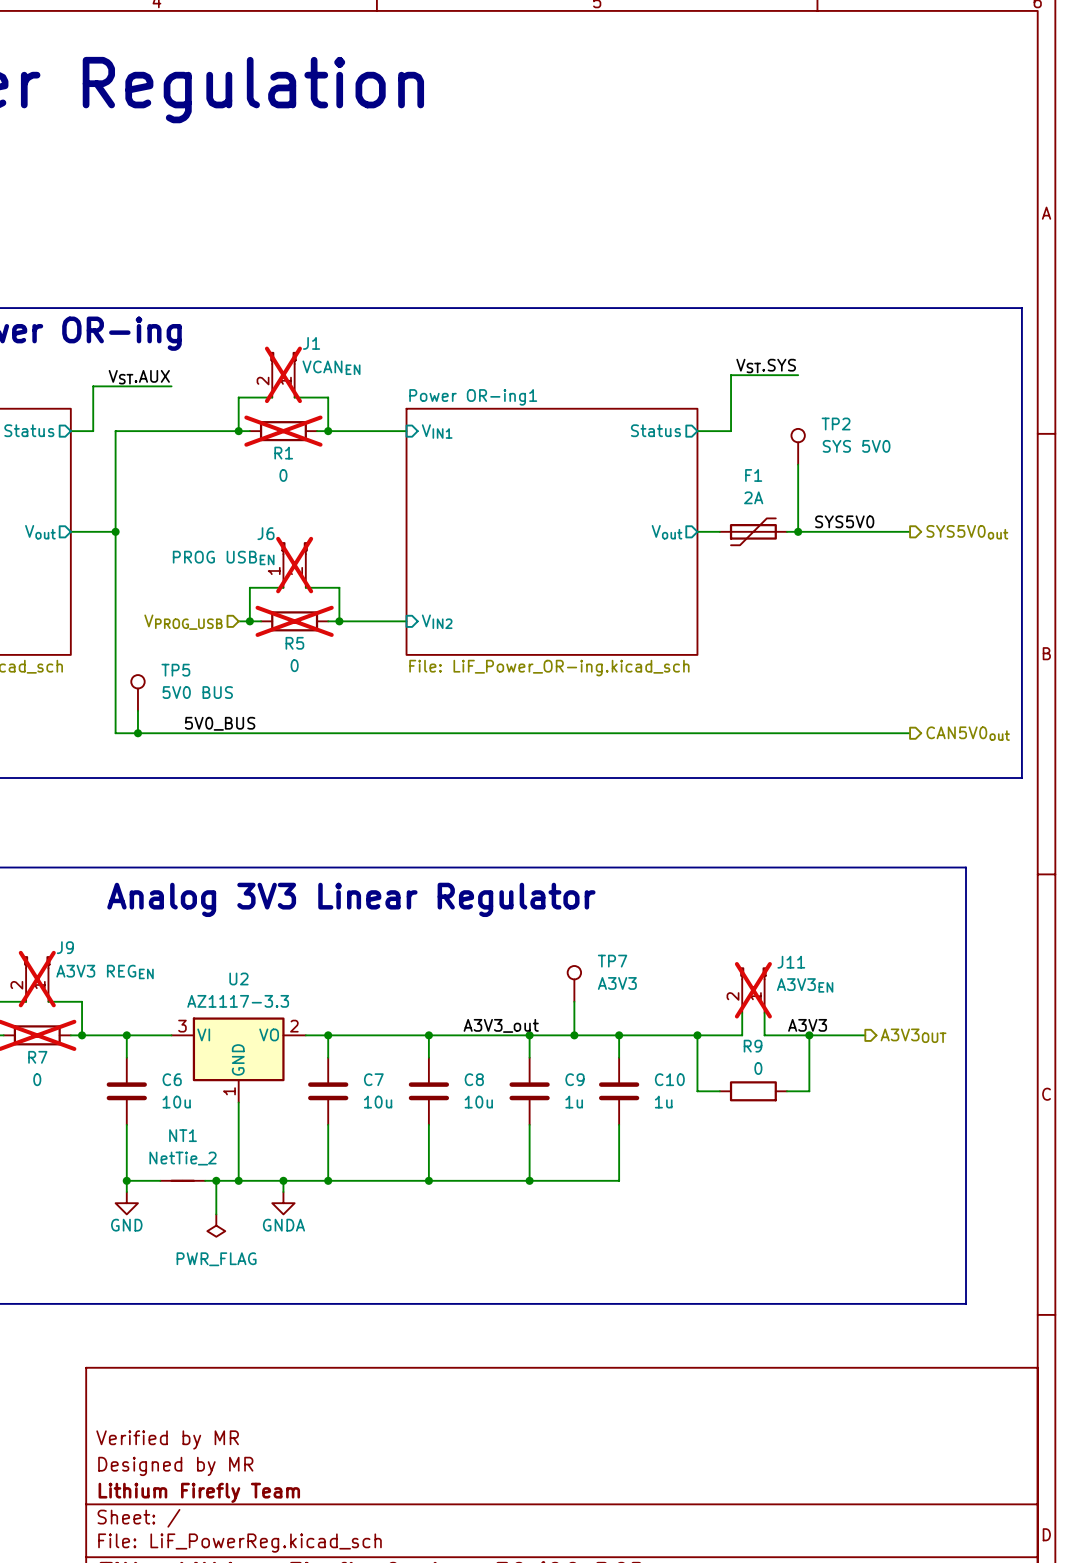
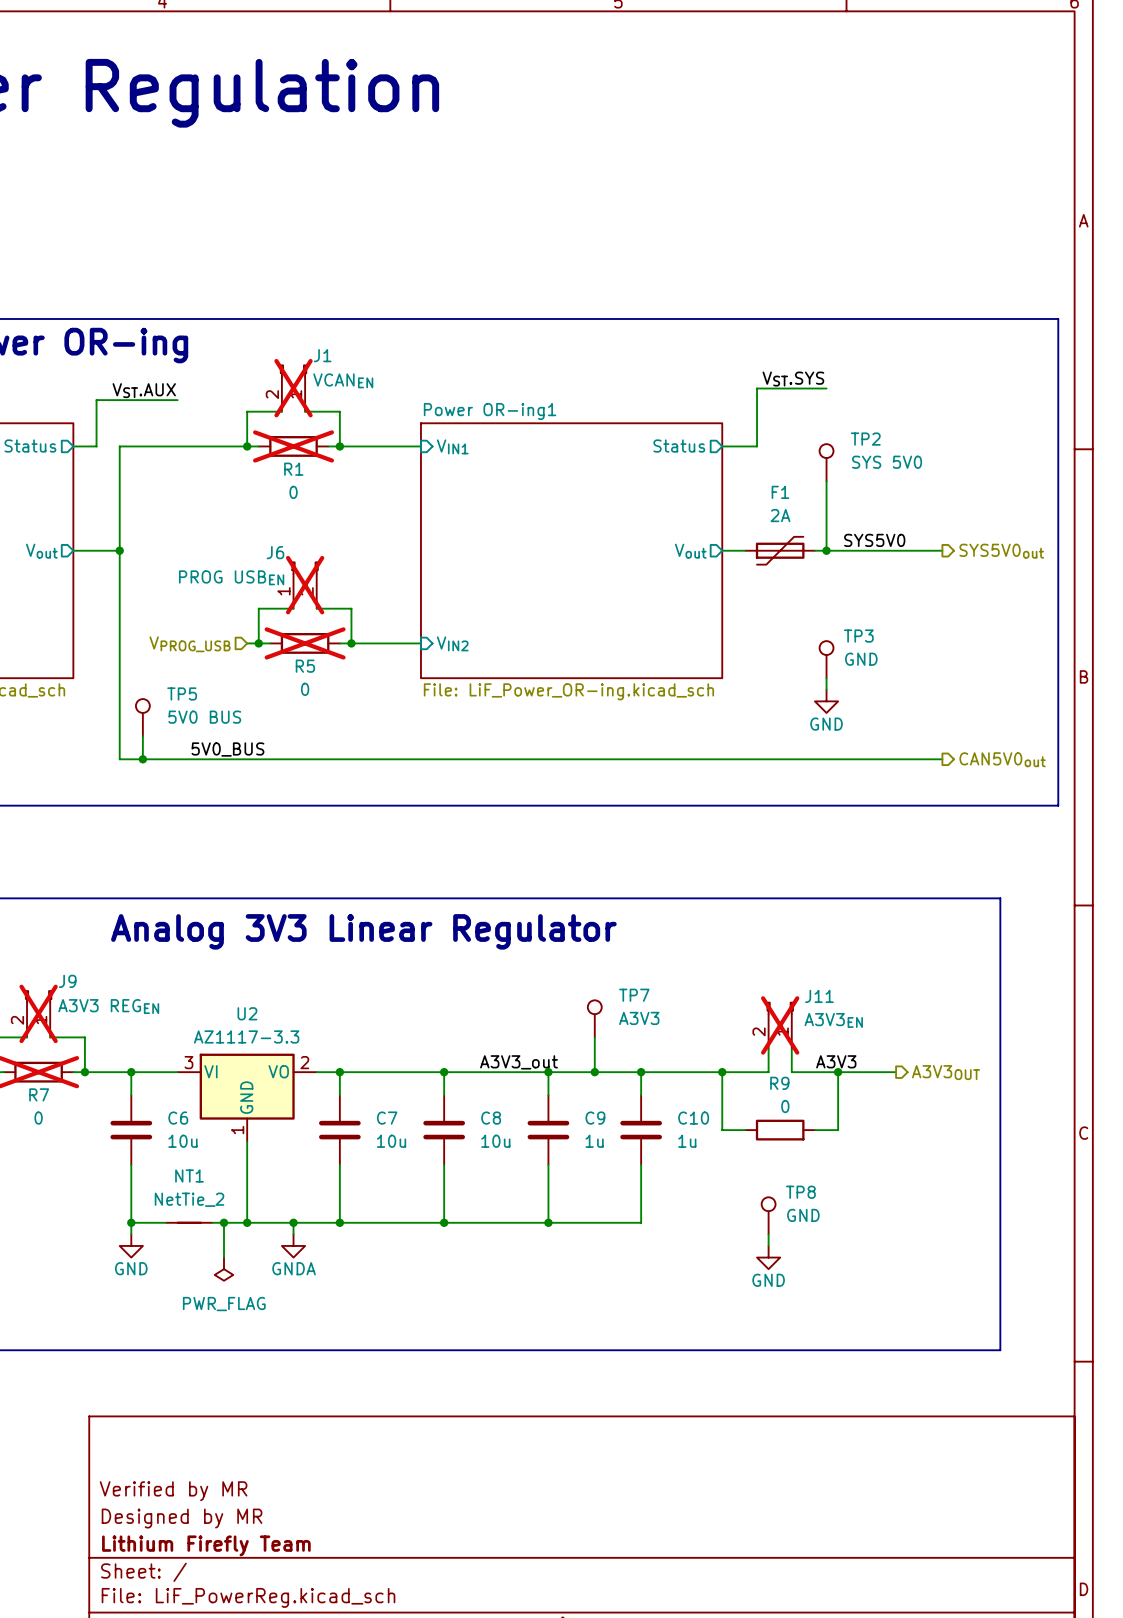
TP3: none -> GND (826, 659)
wire: none -> (826, 678) (826, 689)
power symbol: none -> GND (826, 701)
TP8: none -> GND (768, 1215)
wire: none -> (768, 1234) (768, 1245)
power symbol: none -> GND (768, 1257)

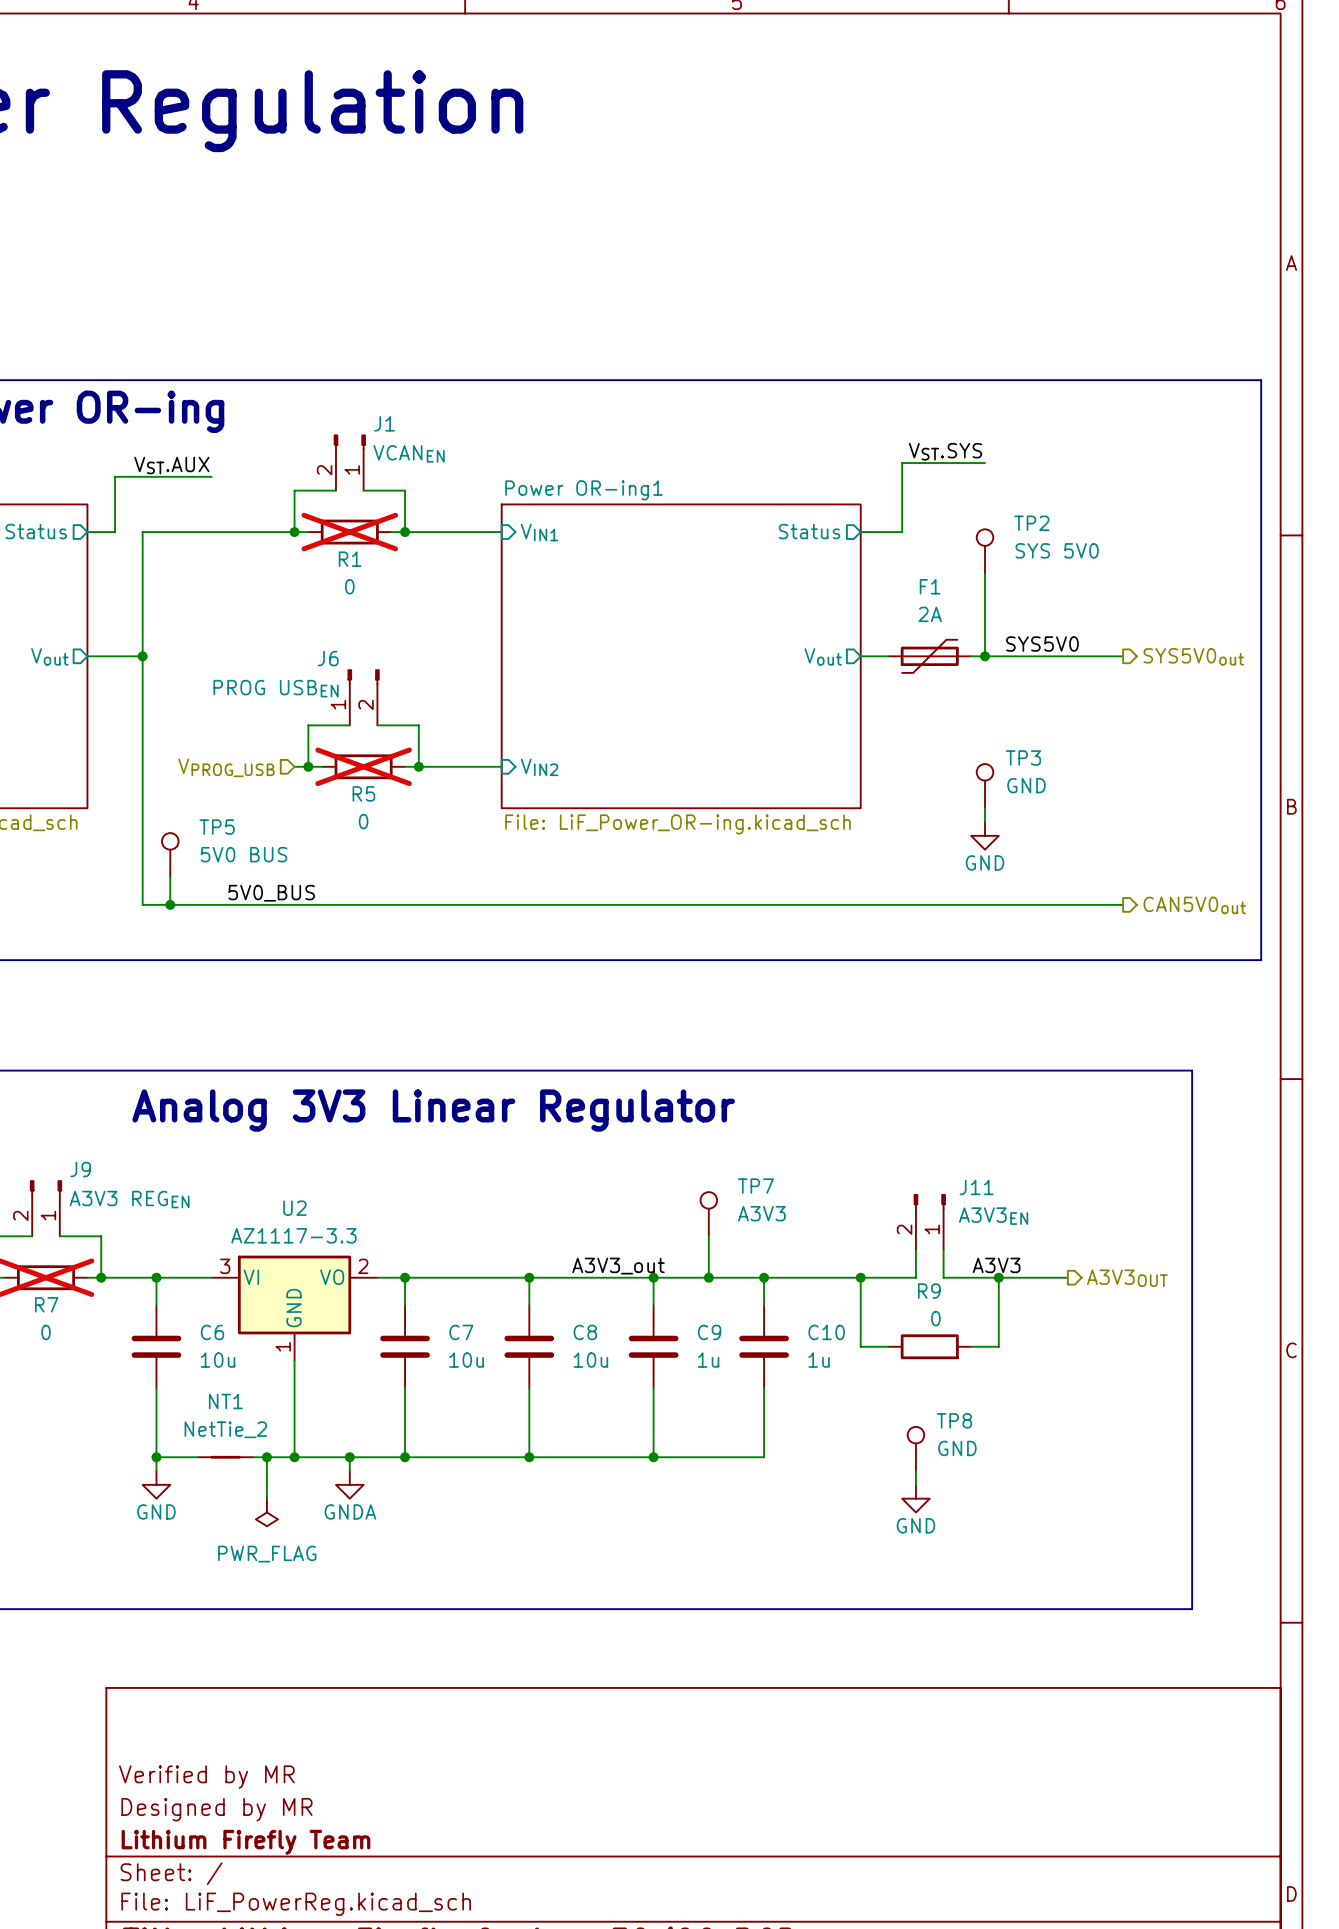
J1 do-not-place cross: (293, 388) -> none
J6 do-not-place cross: (305, 585) -> none
J9 do-not-place cross: (38, 1013) -> none
J11 do-not-place cross: (780, 1025) -> none

